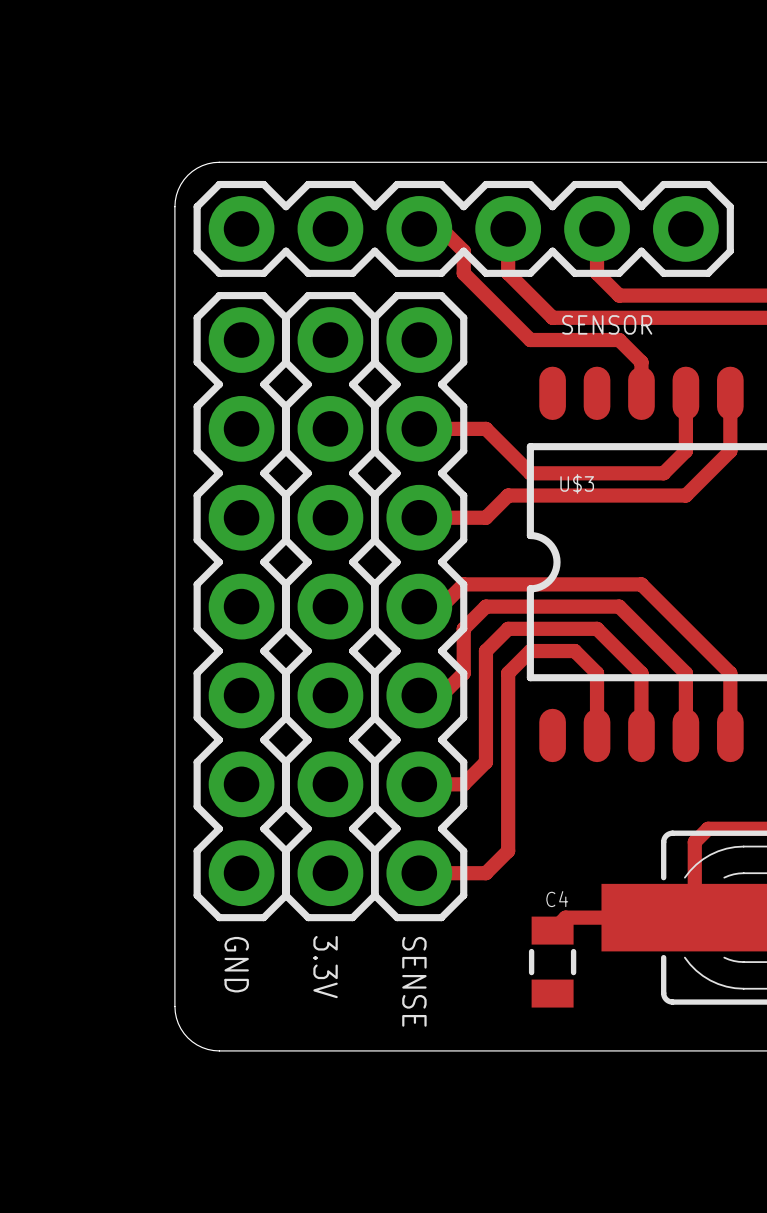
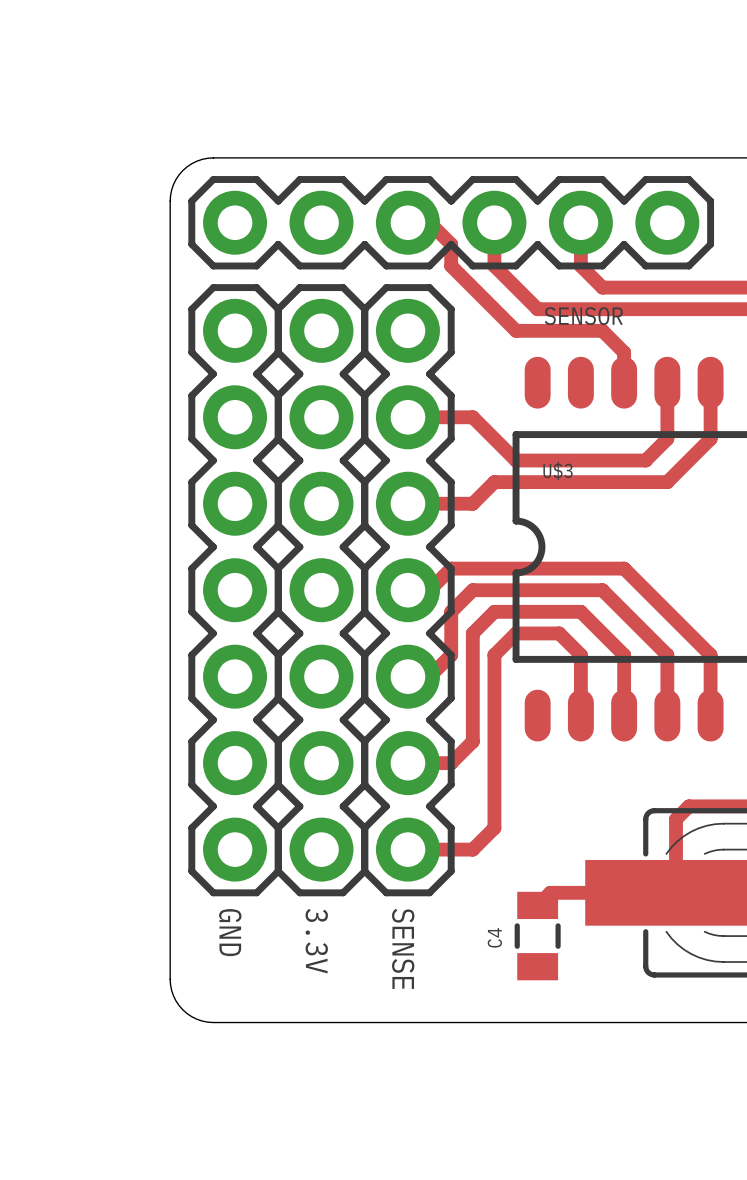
C4 name rotation: 0° (557, 899) -> 90° counterclockwise (494, 937)
C4 name position: C4 (557, 899) -> C4 (494, 937)

